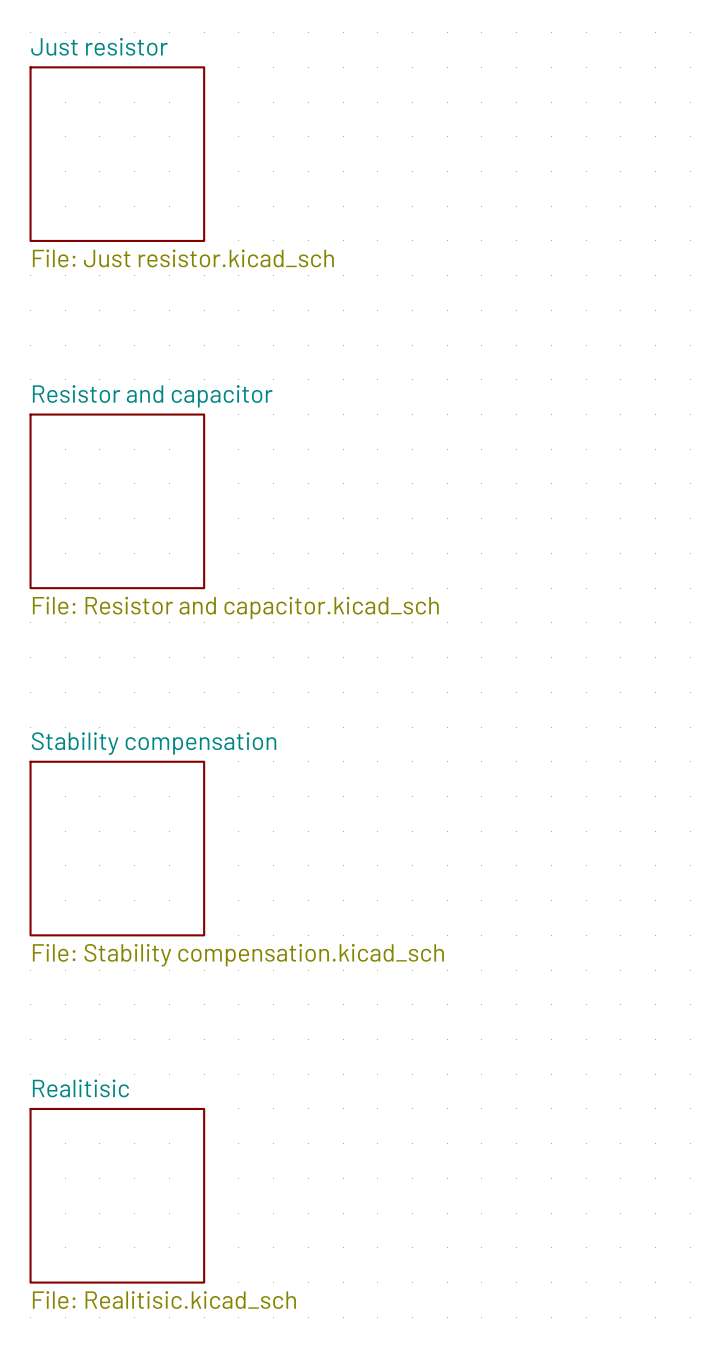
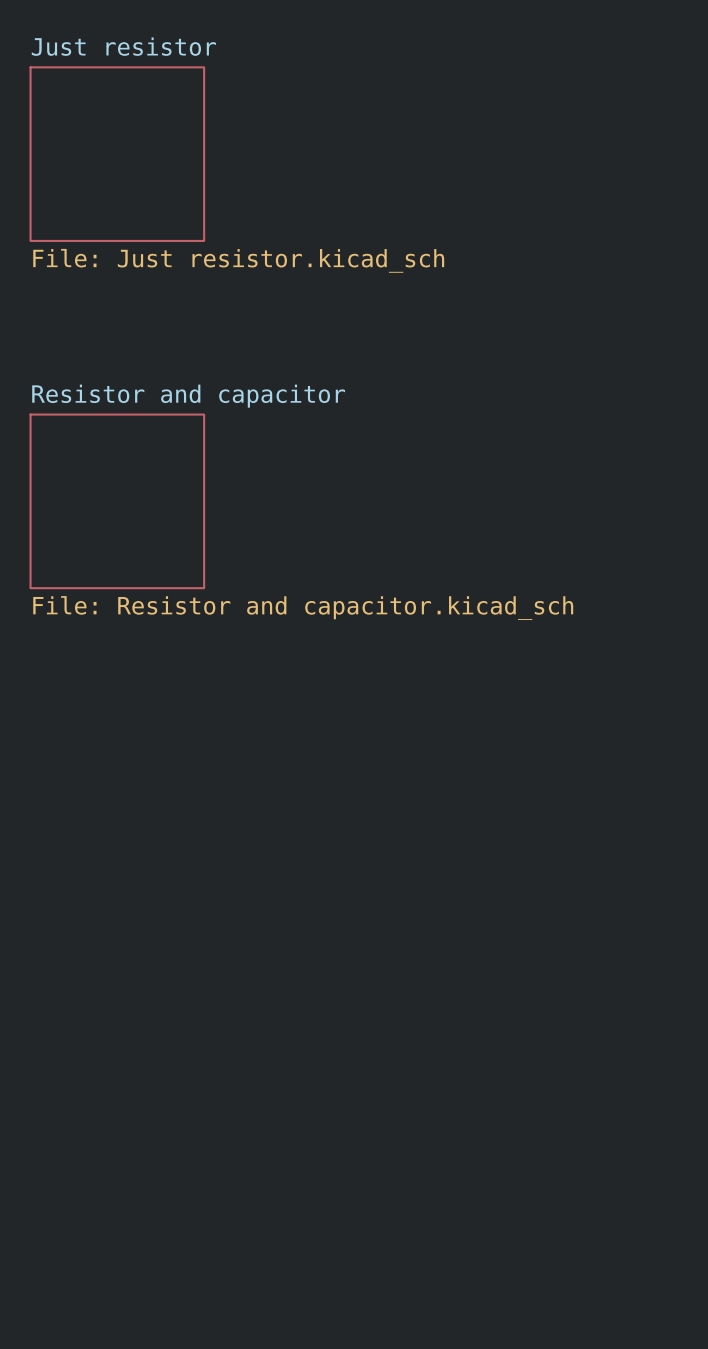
sheet Stability compensation: File: Stability compensation.kicad_sch (117, 848) -> none
sheet Realitisic: File: Realitisic.kicad_sch (117, 1195) -> none

